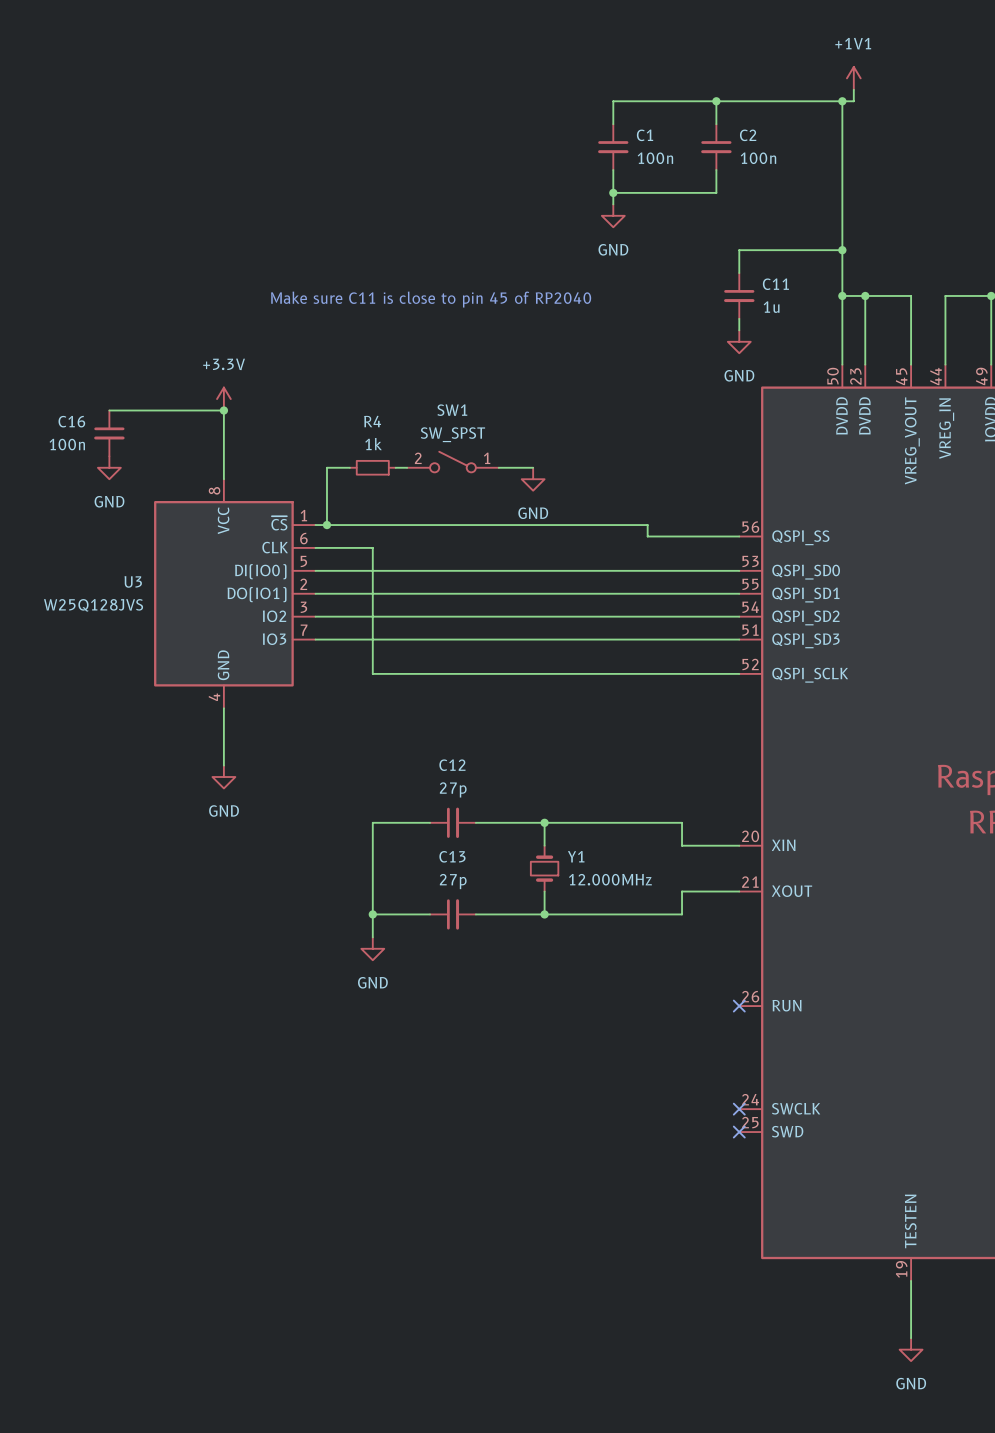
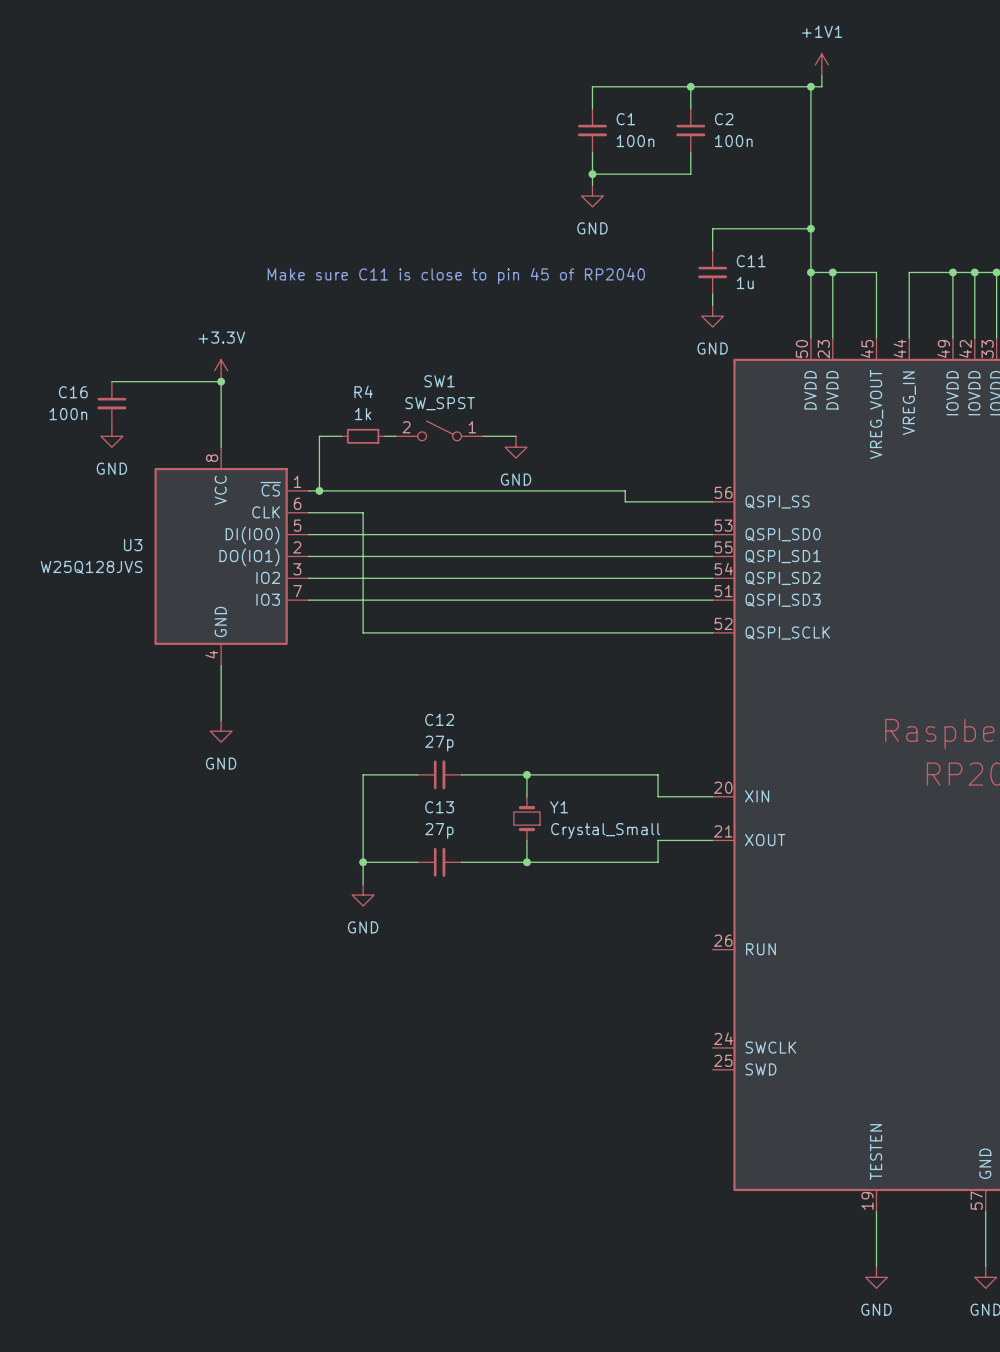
Y1 value: 12.000MHz (610, 879) -> Crystal_Small (605, 830)
no-connect mark: (739, 1006) -> none
no-connect mark: (739, 1109) -> none
no-connect mark: (739, 1132) -> none

